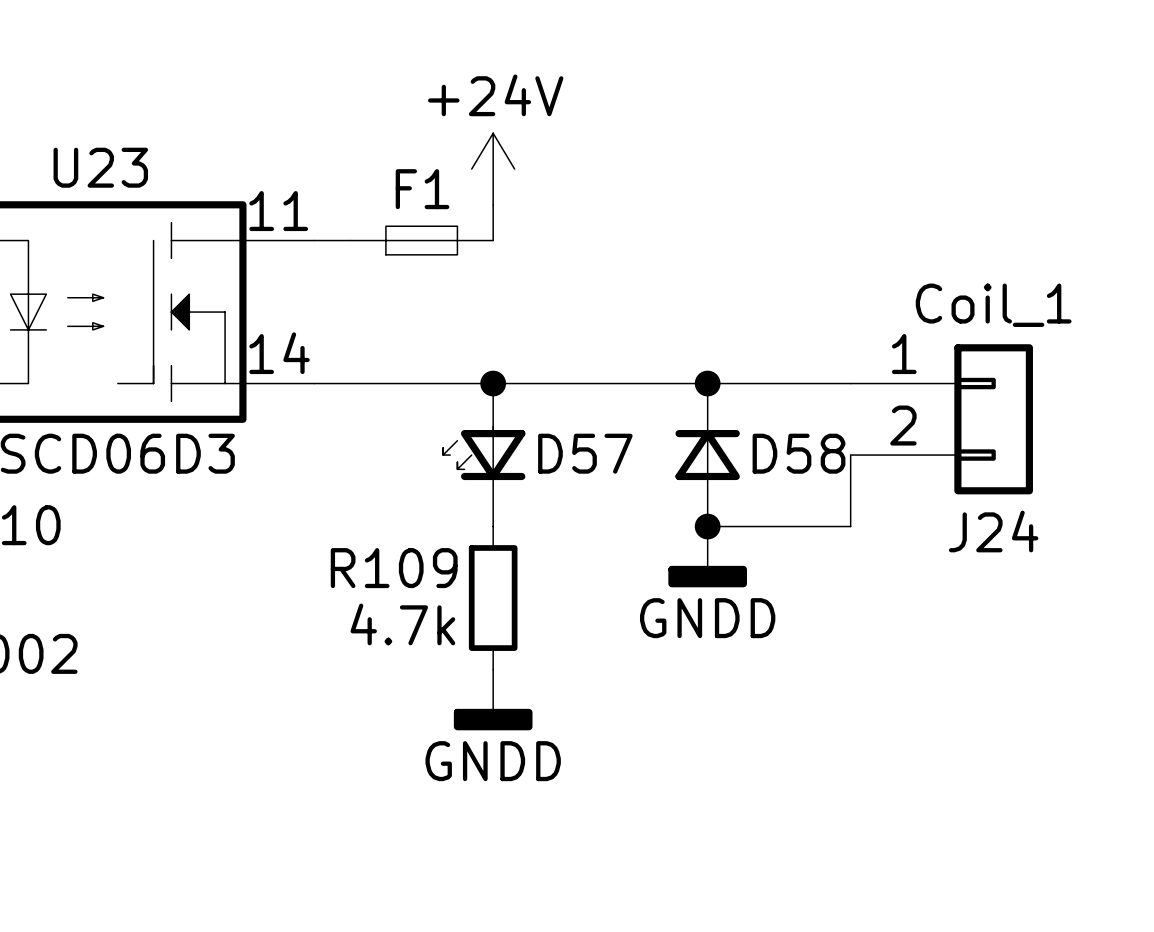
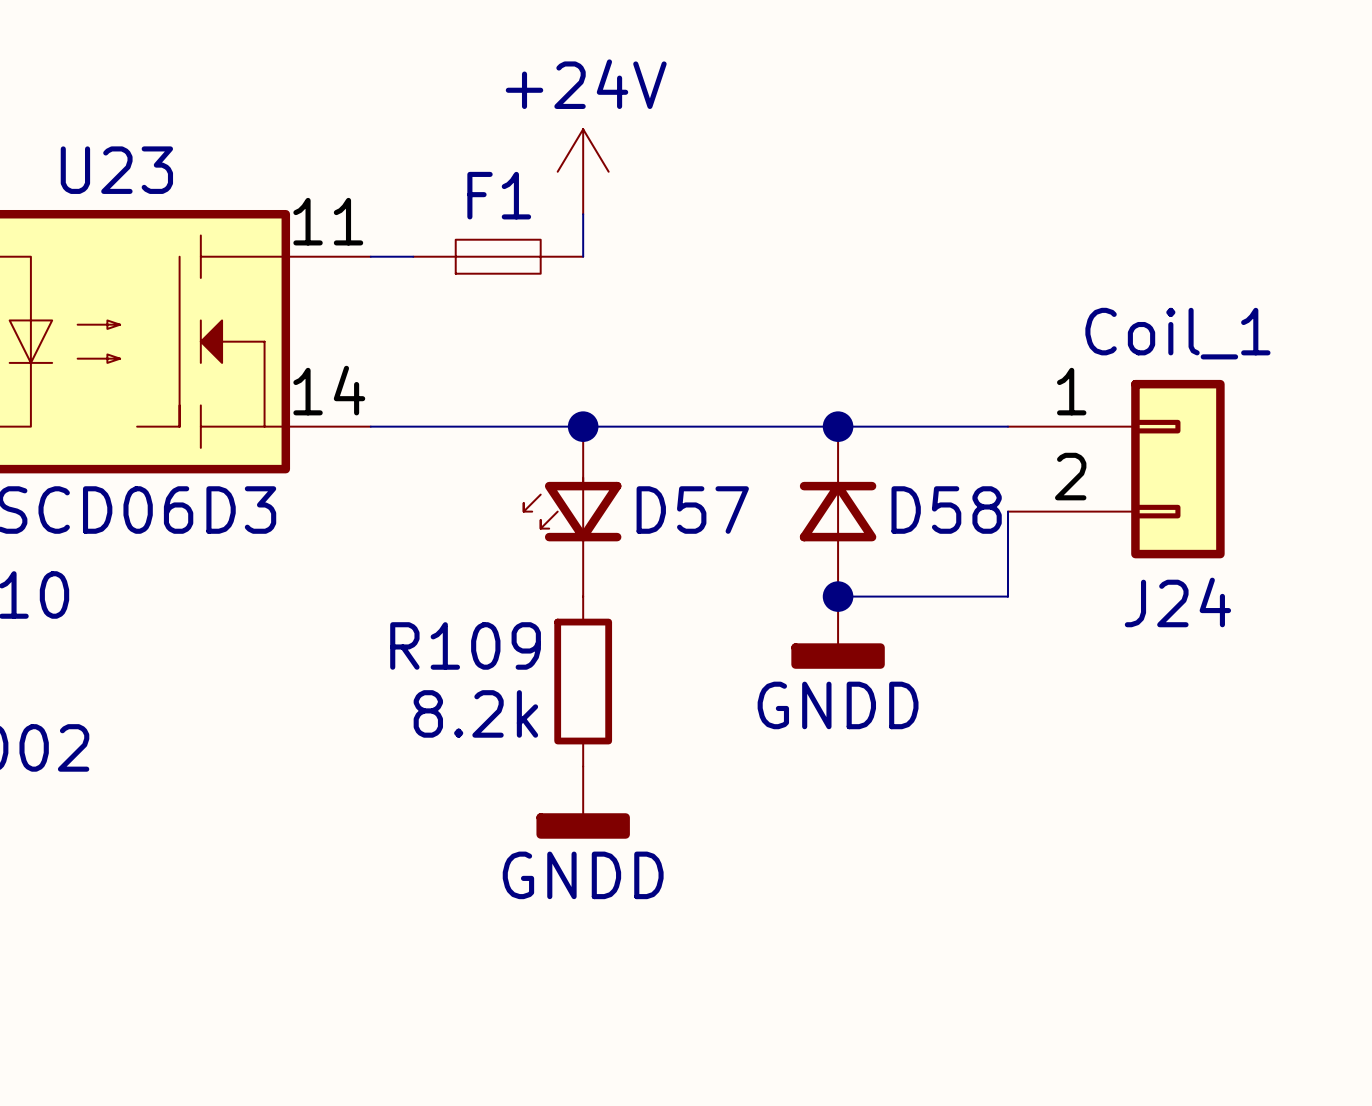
R109 value: 4.7k (402, 624) -> 8.2k (475, 713)

